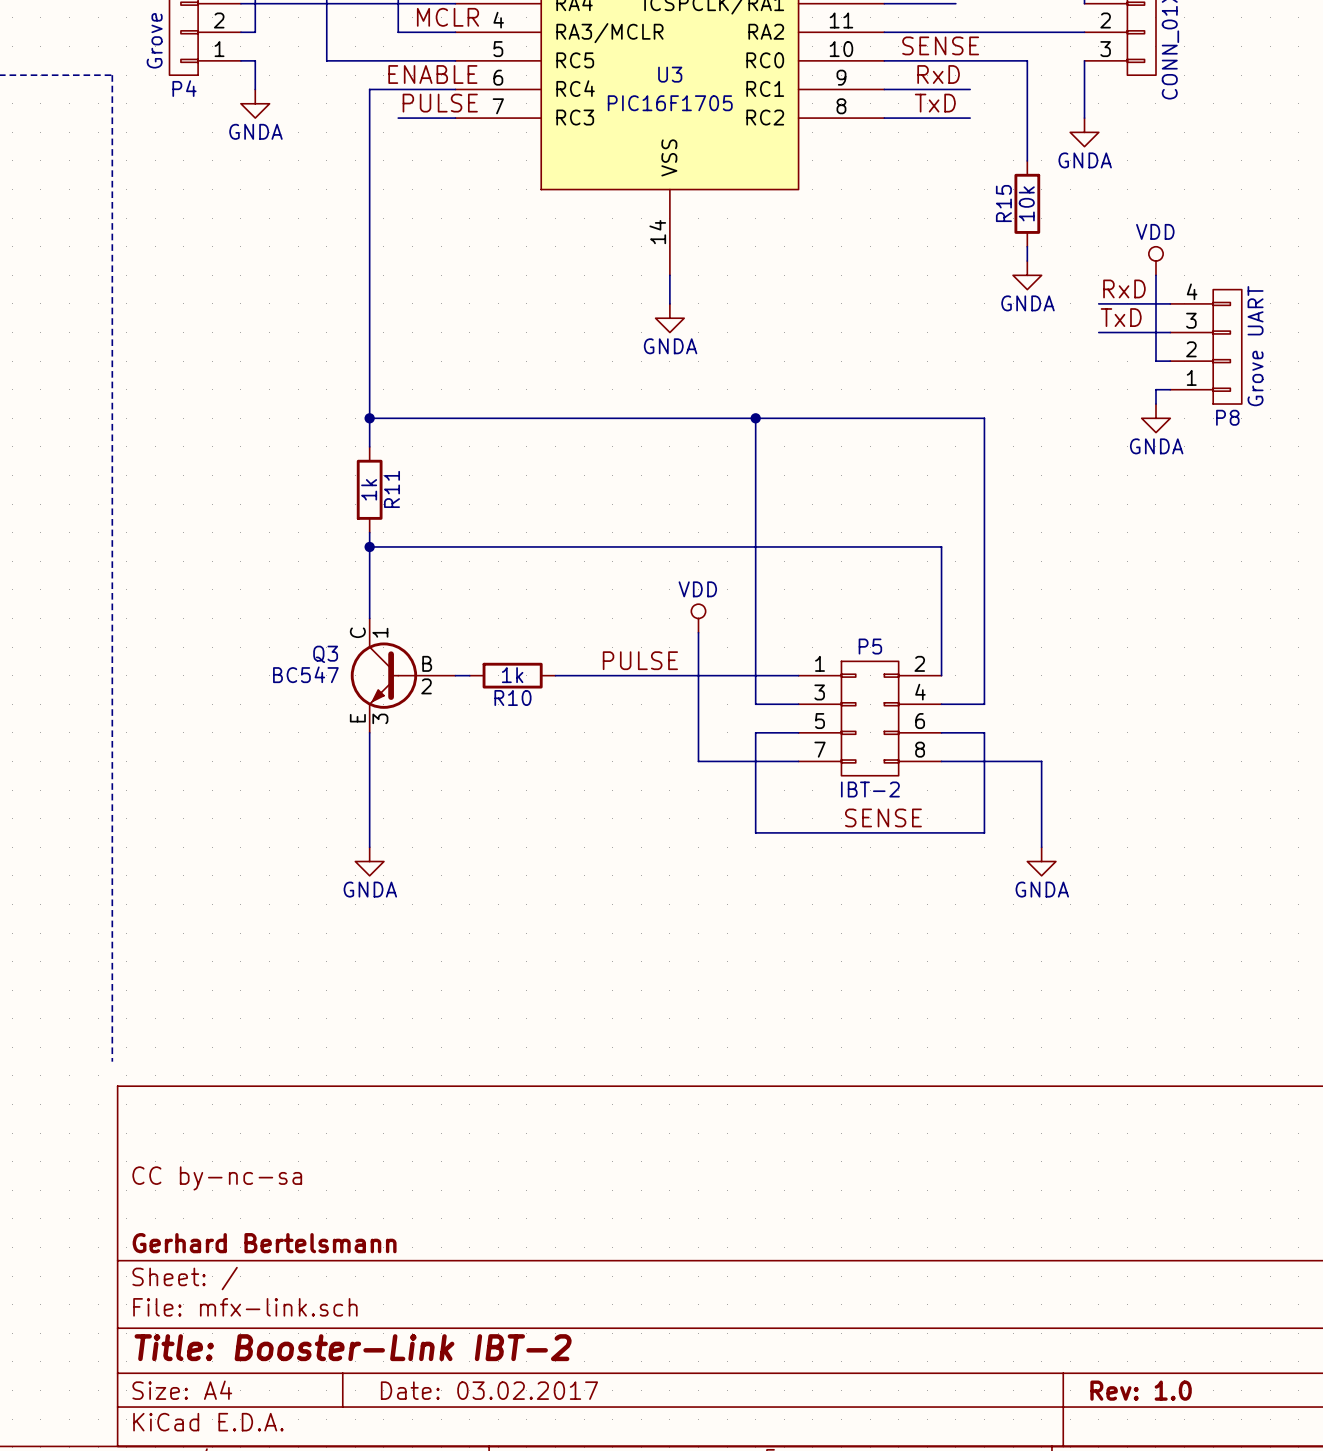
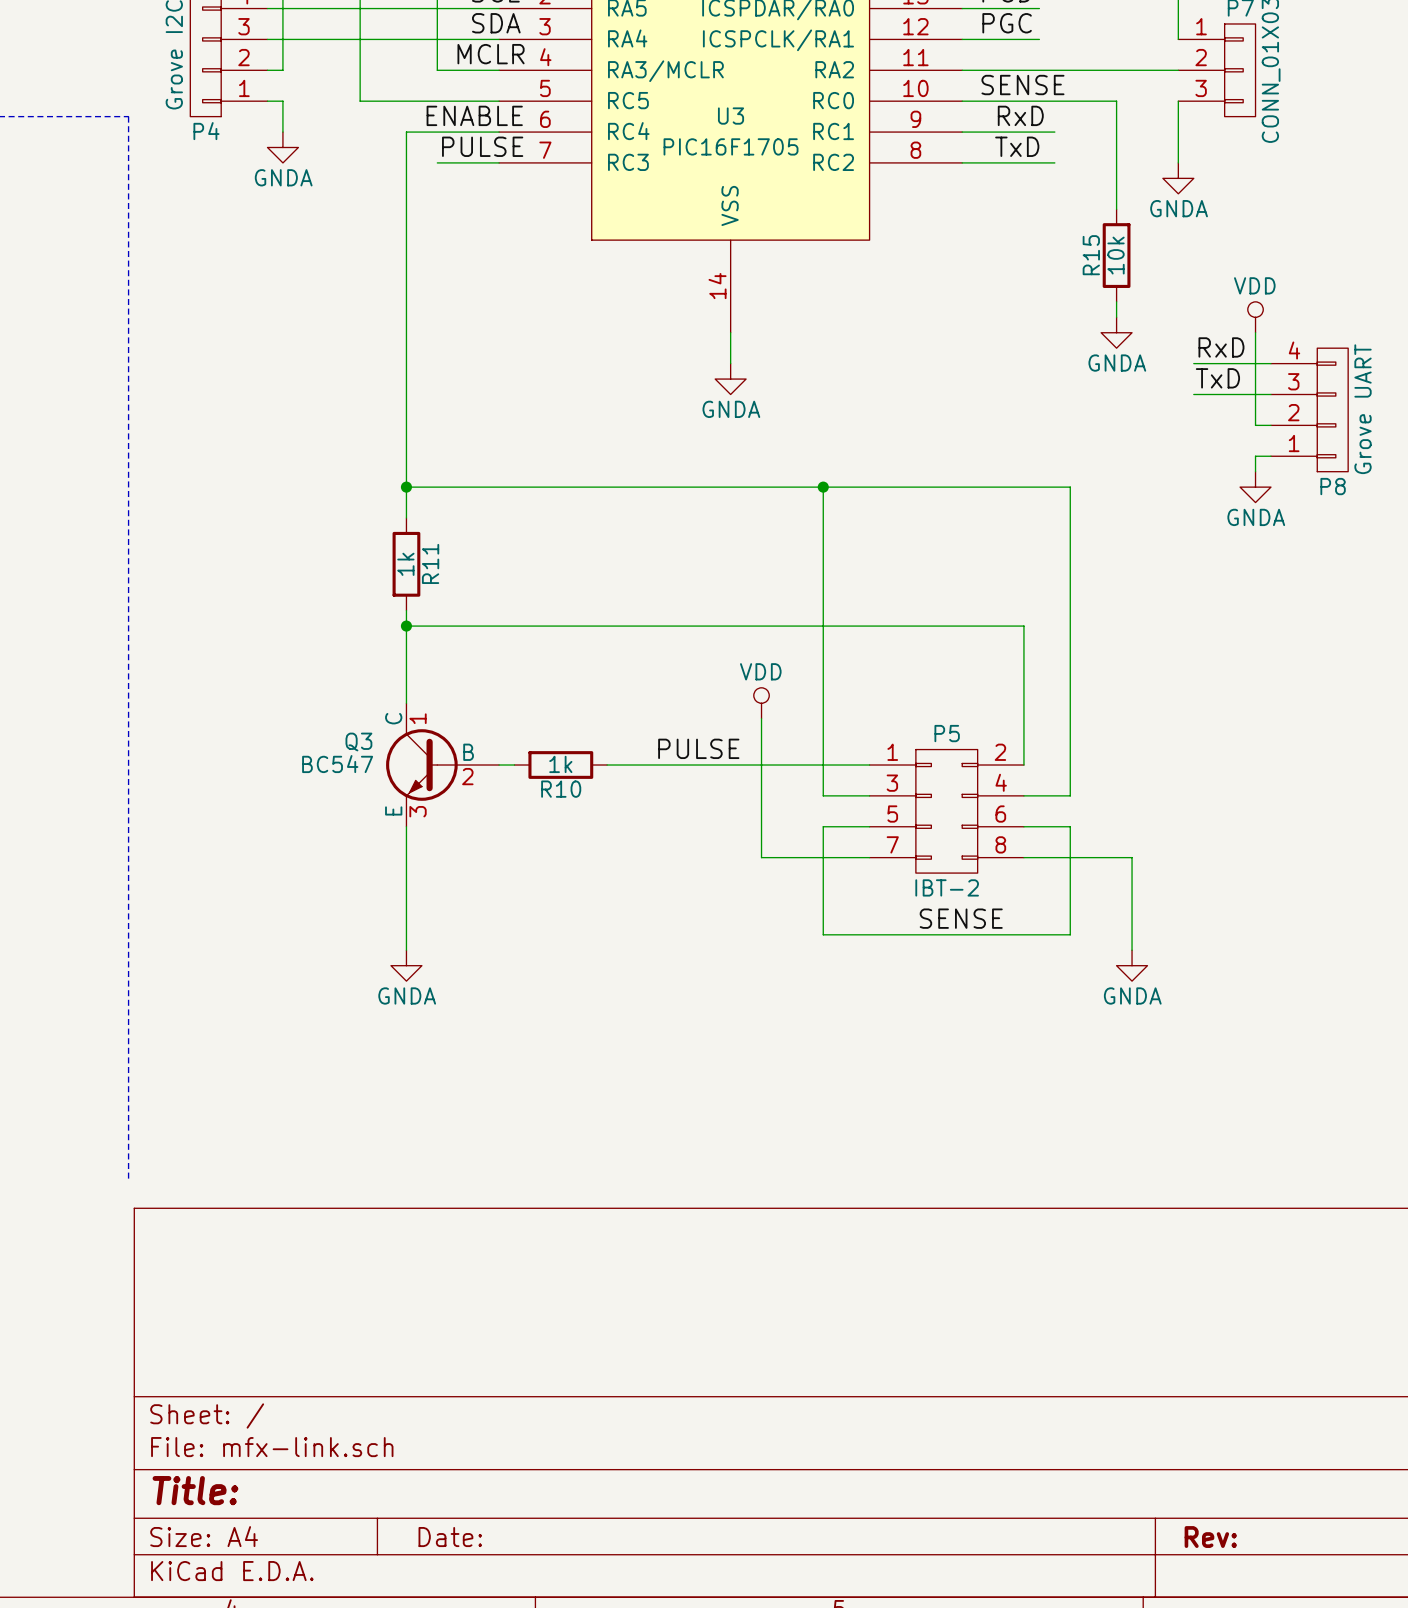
title block: CC by-nc-sa (217, 1178) -> none
title block: Gerhard Bertelsmann (264, 1243) -> none
title block: Title: Booster-Link IBT-2 (353, 1347) -> Title: (195, 1490)
title block: Date: 03.02.2017 (489, 1390) -> Date: (450, 1537)
title block: Rev: 1.0 (1141, 1390) -> Rev: (1210, 1537)

